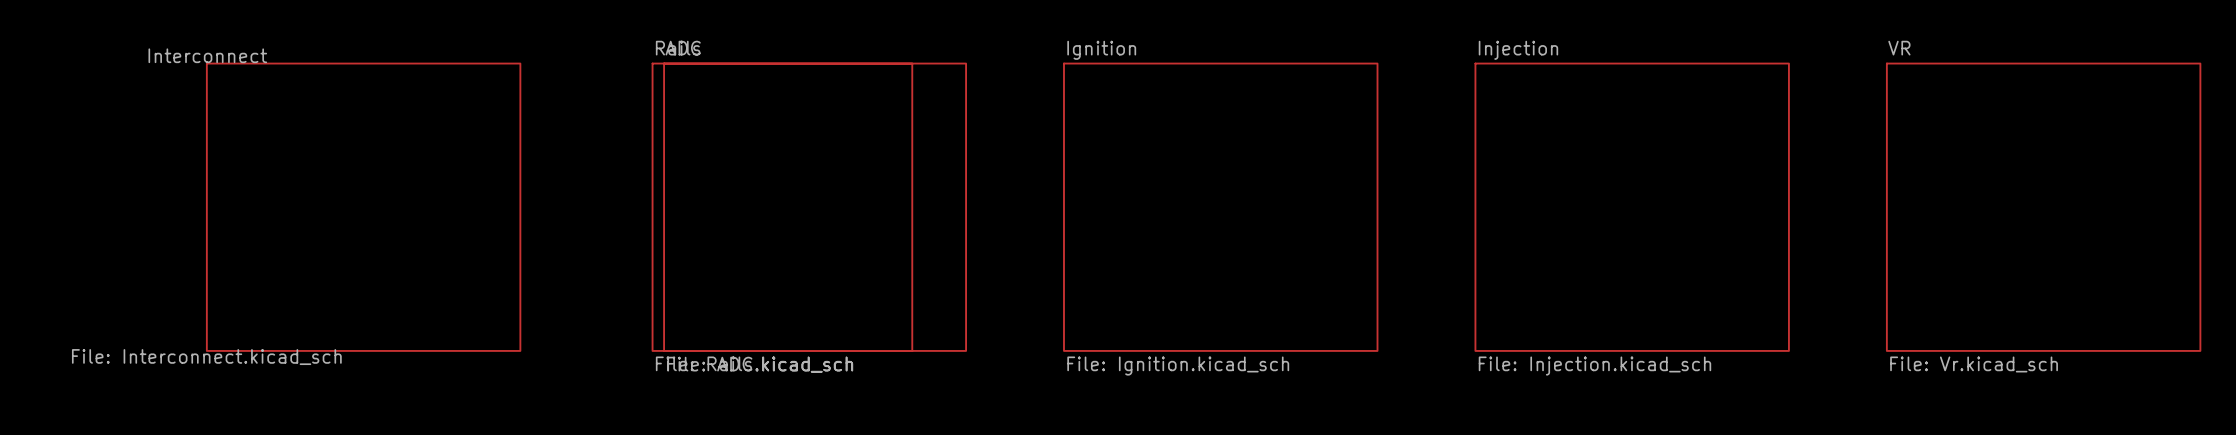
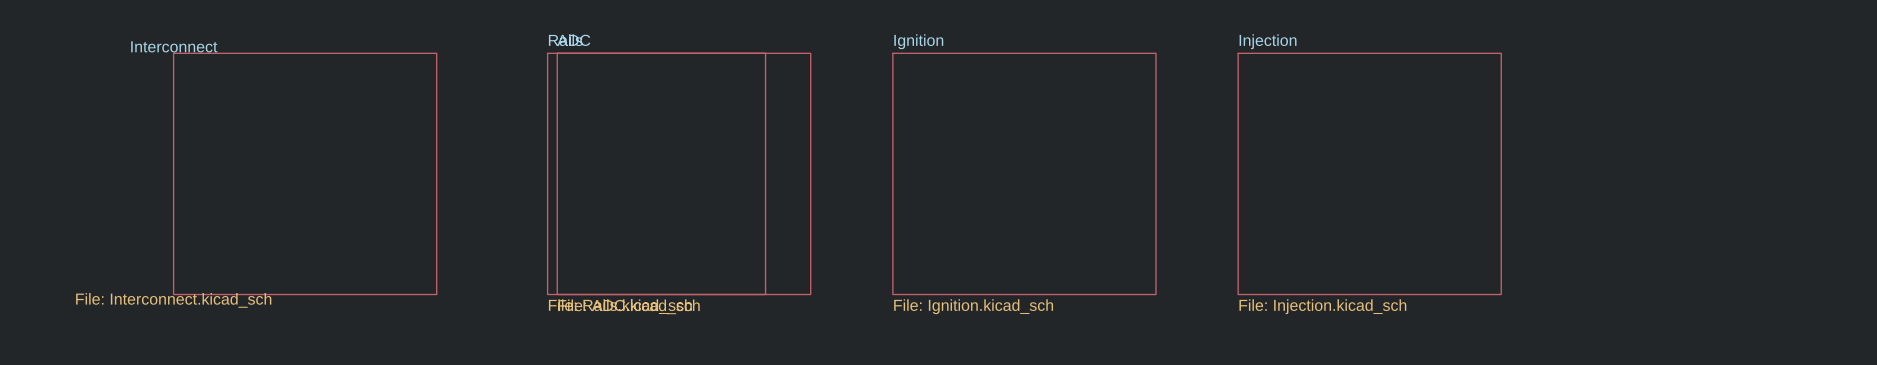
sheet VR: File: Vr.kicad_sch (2043, 207) -> none

